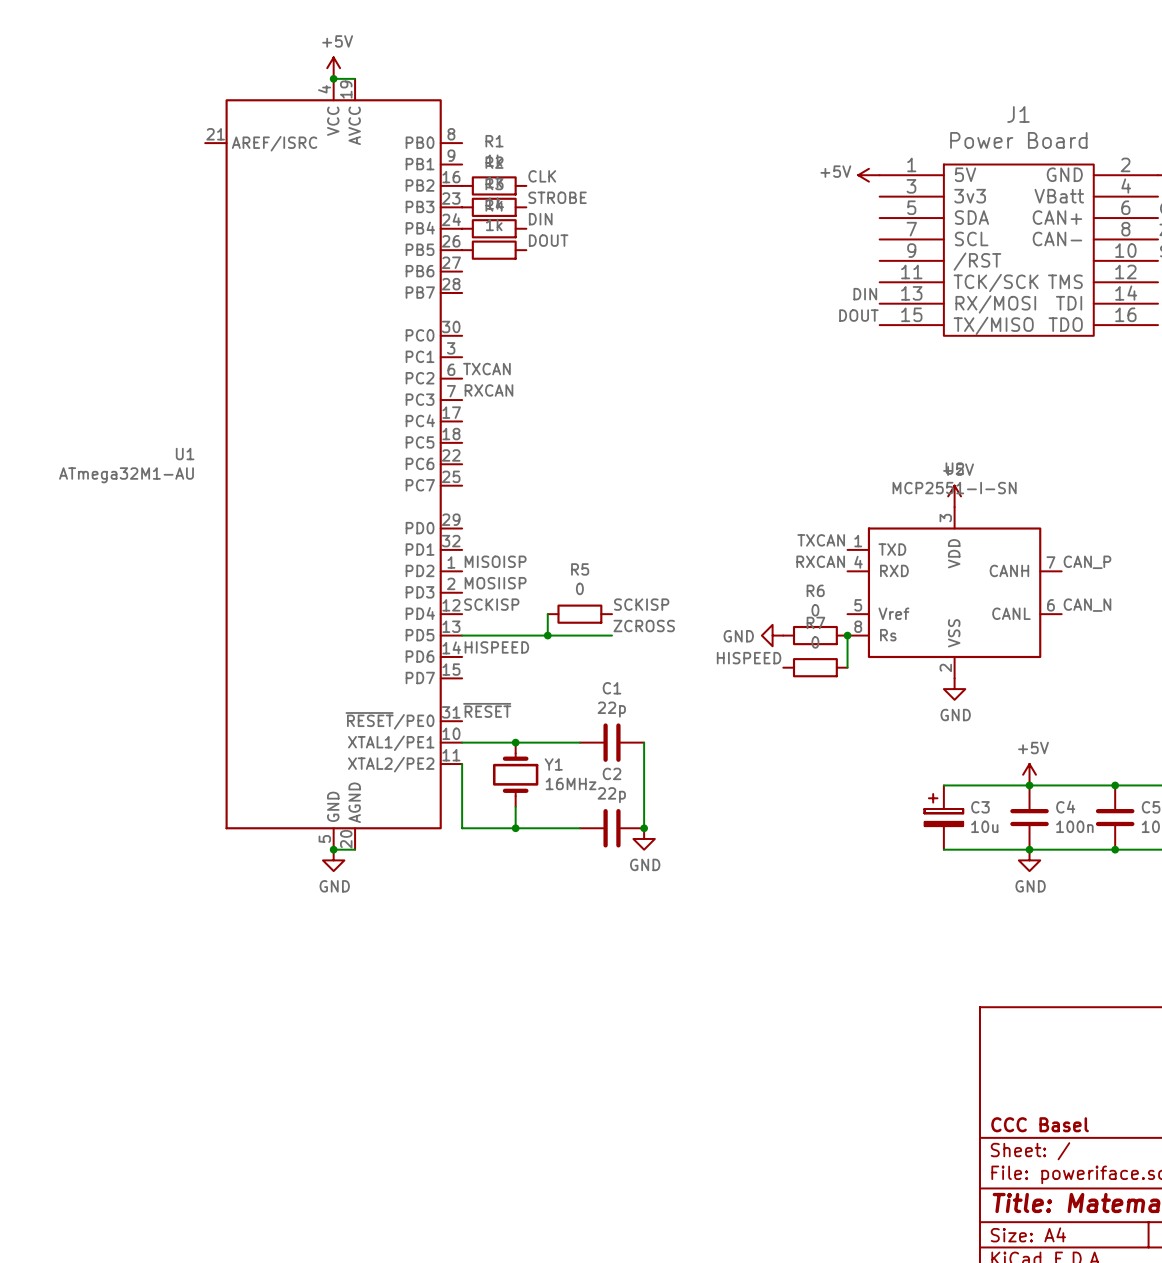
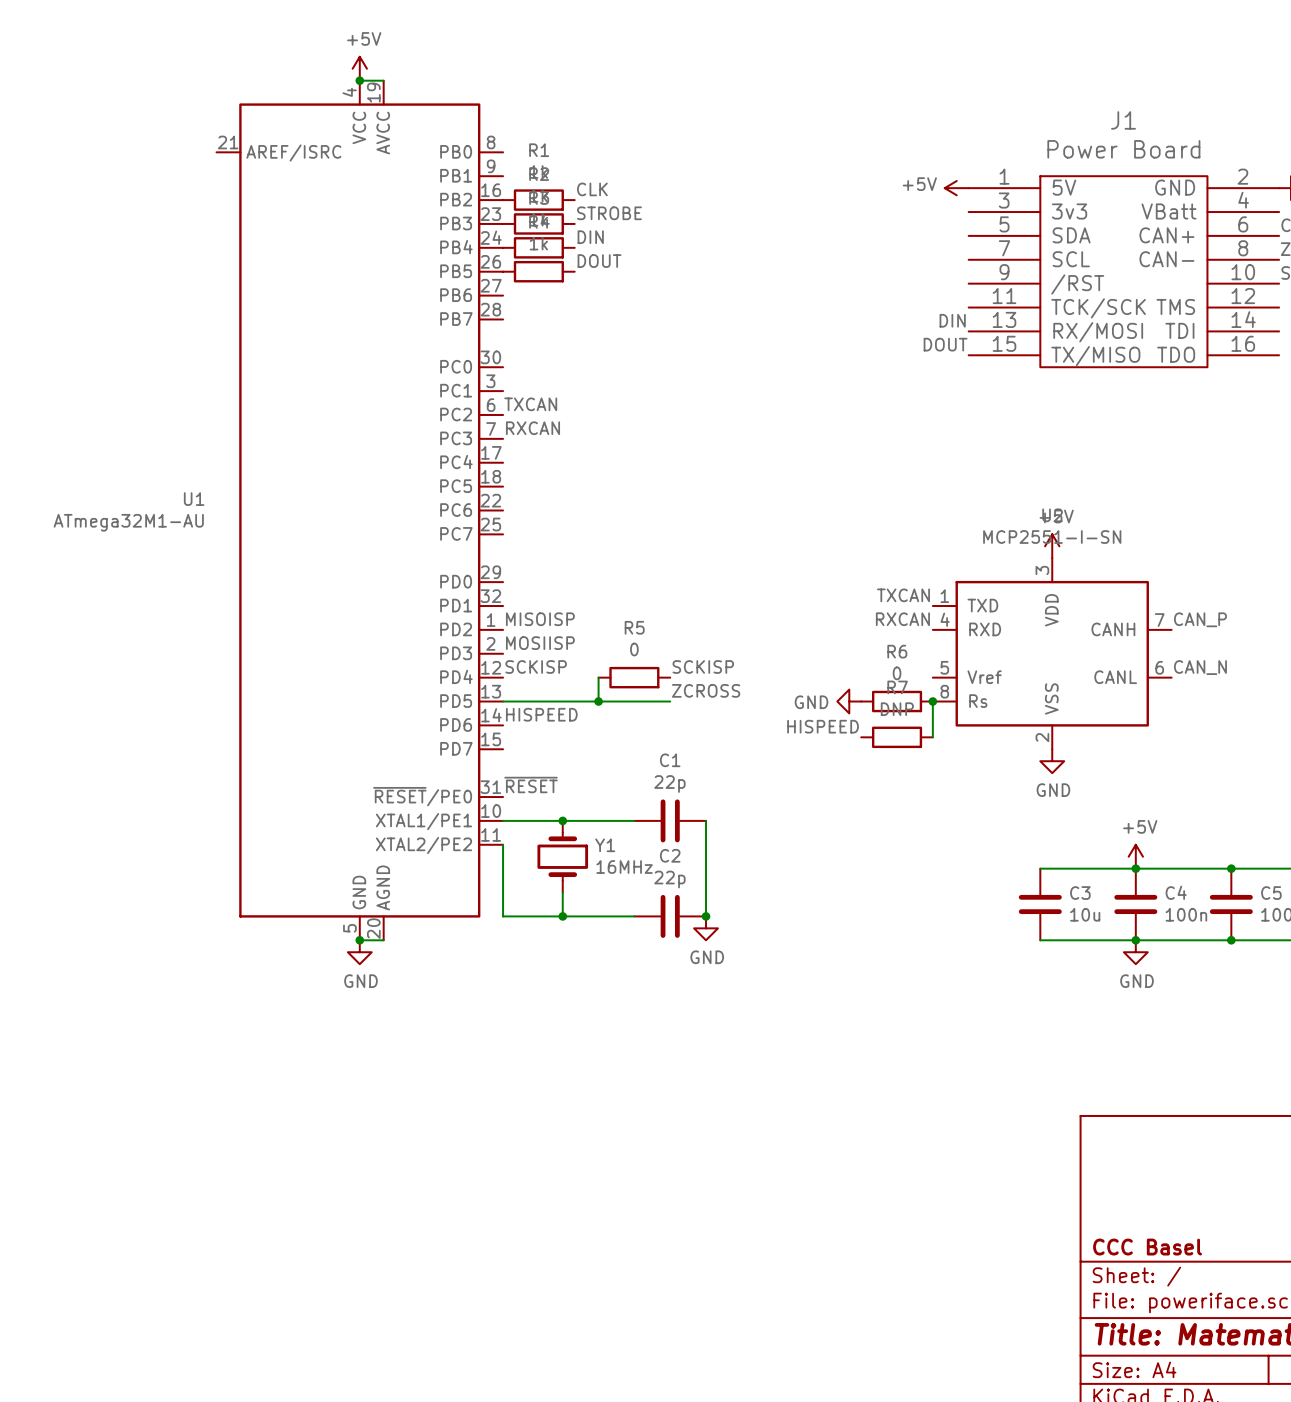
R7 value: 0 (815, 642) -> DNP (897, 709)
C3 symbol: [924, 785, 964, 850] -> [1018, 868, 1062, 941]

